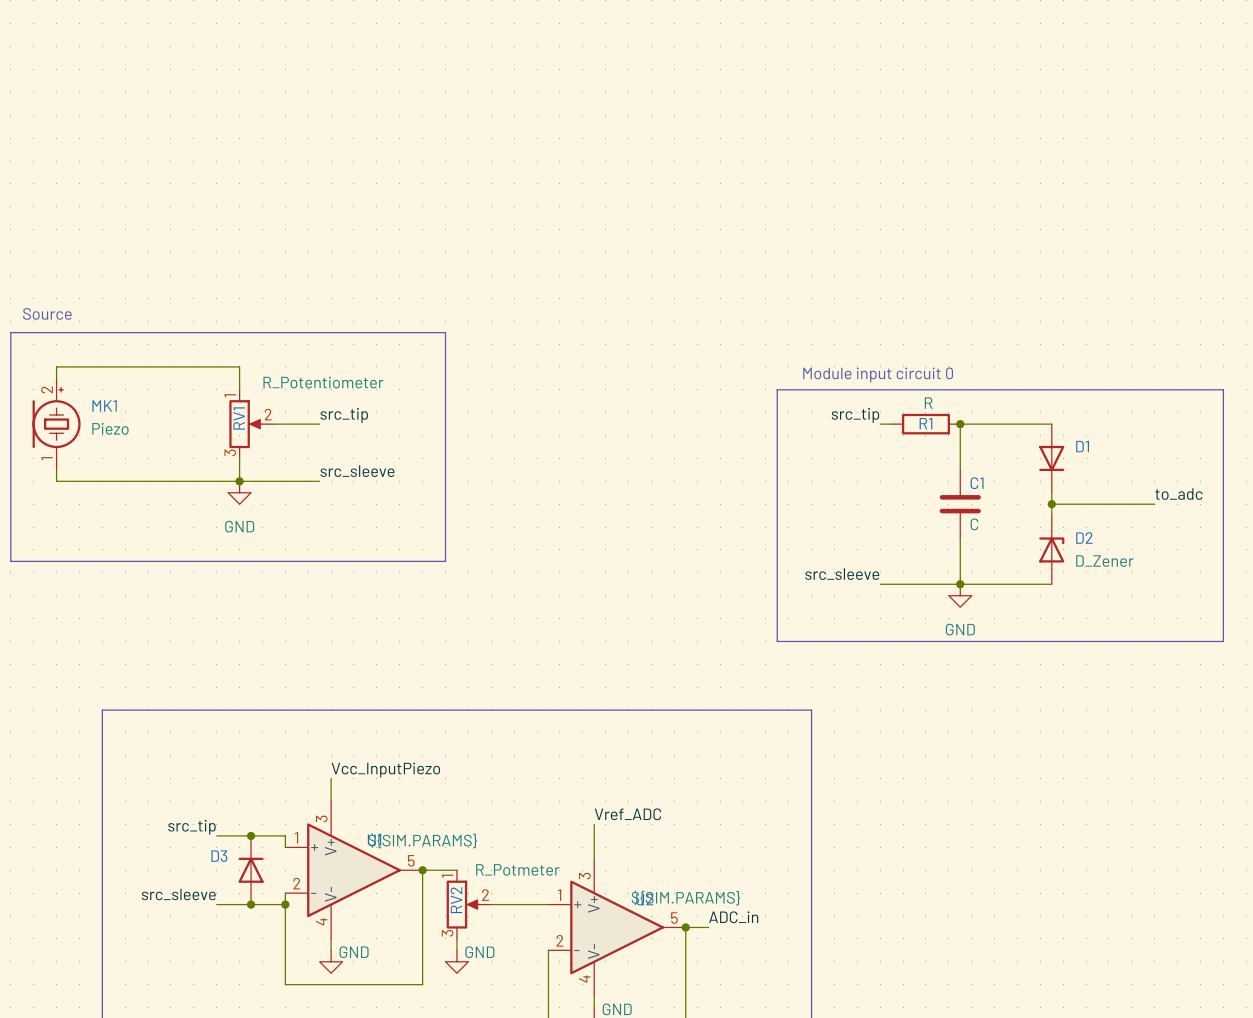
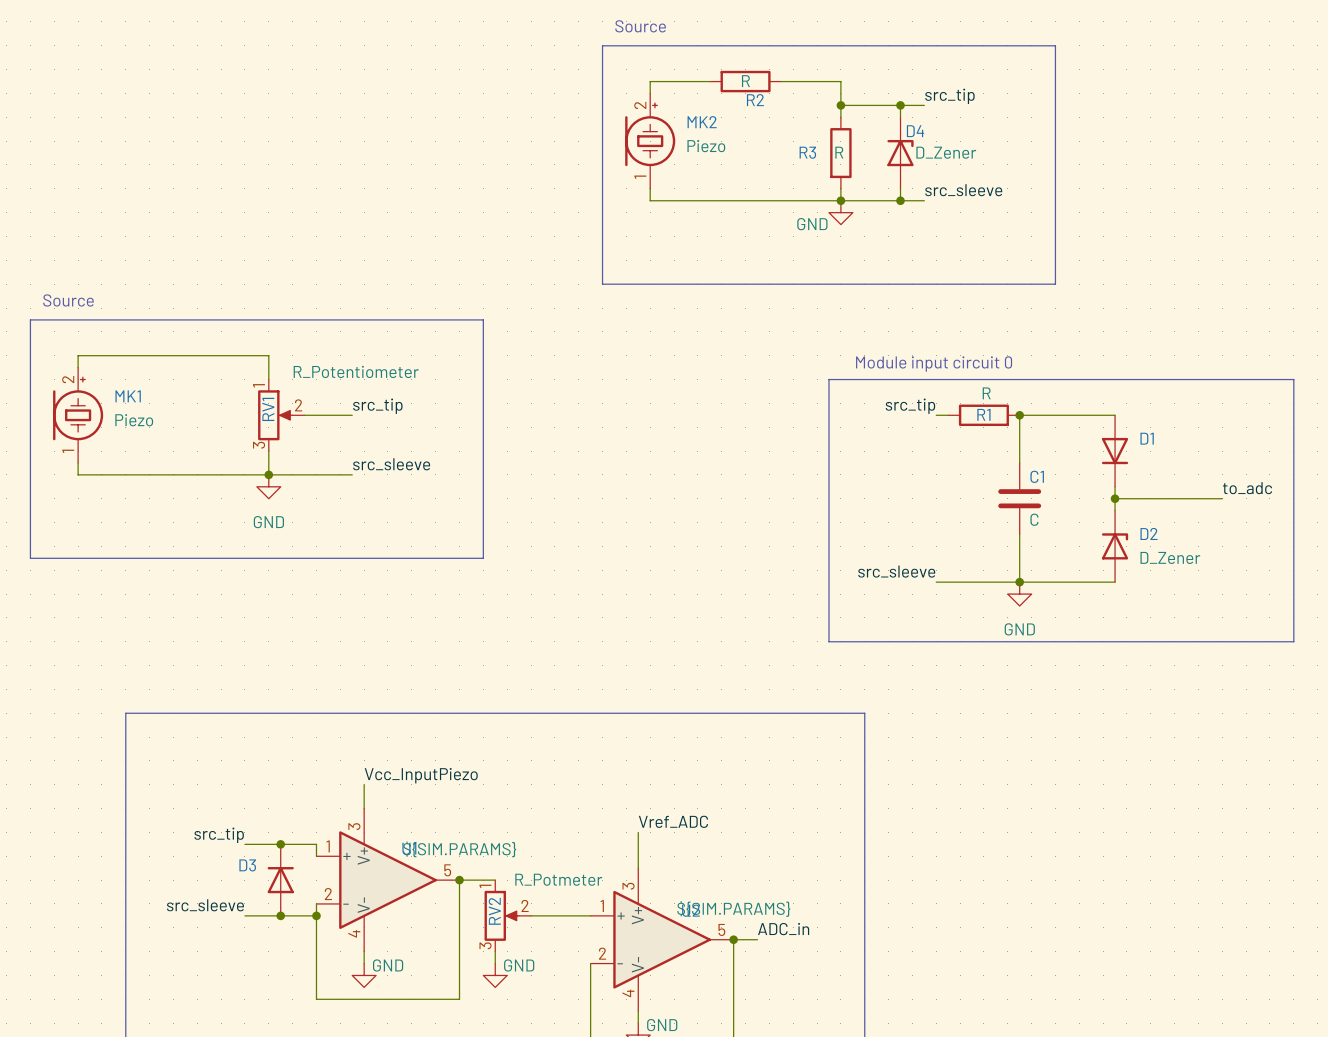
text: none -> Source (640, 26)
line: none -> (602, 45) (1055, 45) (1055, 284) (602, 284) (602, 45)
wire: none -> (709, 81) (650, 81) (650, 93)
R2: none -> R (745, 81)
wire: none -> (781, 81) (840, 81) (840, 117)
label: none -> src_tip (949, 96)
wire: none -> (840, 105) (924, 105)
junction: none -> (840, 105)
wire: none -> (900, 105) (900, 117)
junction: none -> (900, 105)
MK2: none -> Piezo (650, 141)
R3: none -> R (840, 153)
D4: none -> D_Zener (900, 153)
wire: none -> (650, 188) (650, 200) (924, 200)
wire: none -> (840, 188) (840, 200)
wire: none -> (900, 188) (900, 200)
label: none -> src_sleeve (963, 190)
junction: none -> (840, 200)
junction: none -> (900, 200)
power symbol: none -> GND (840, 212)

